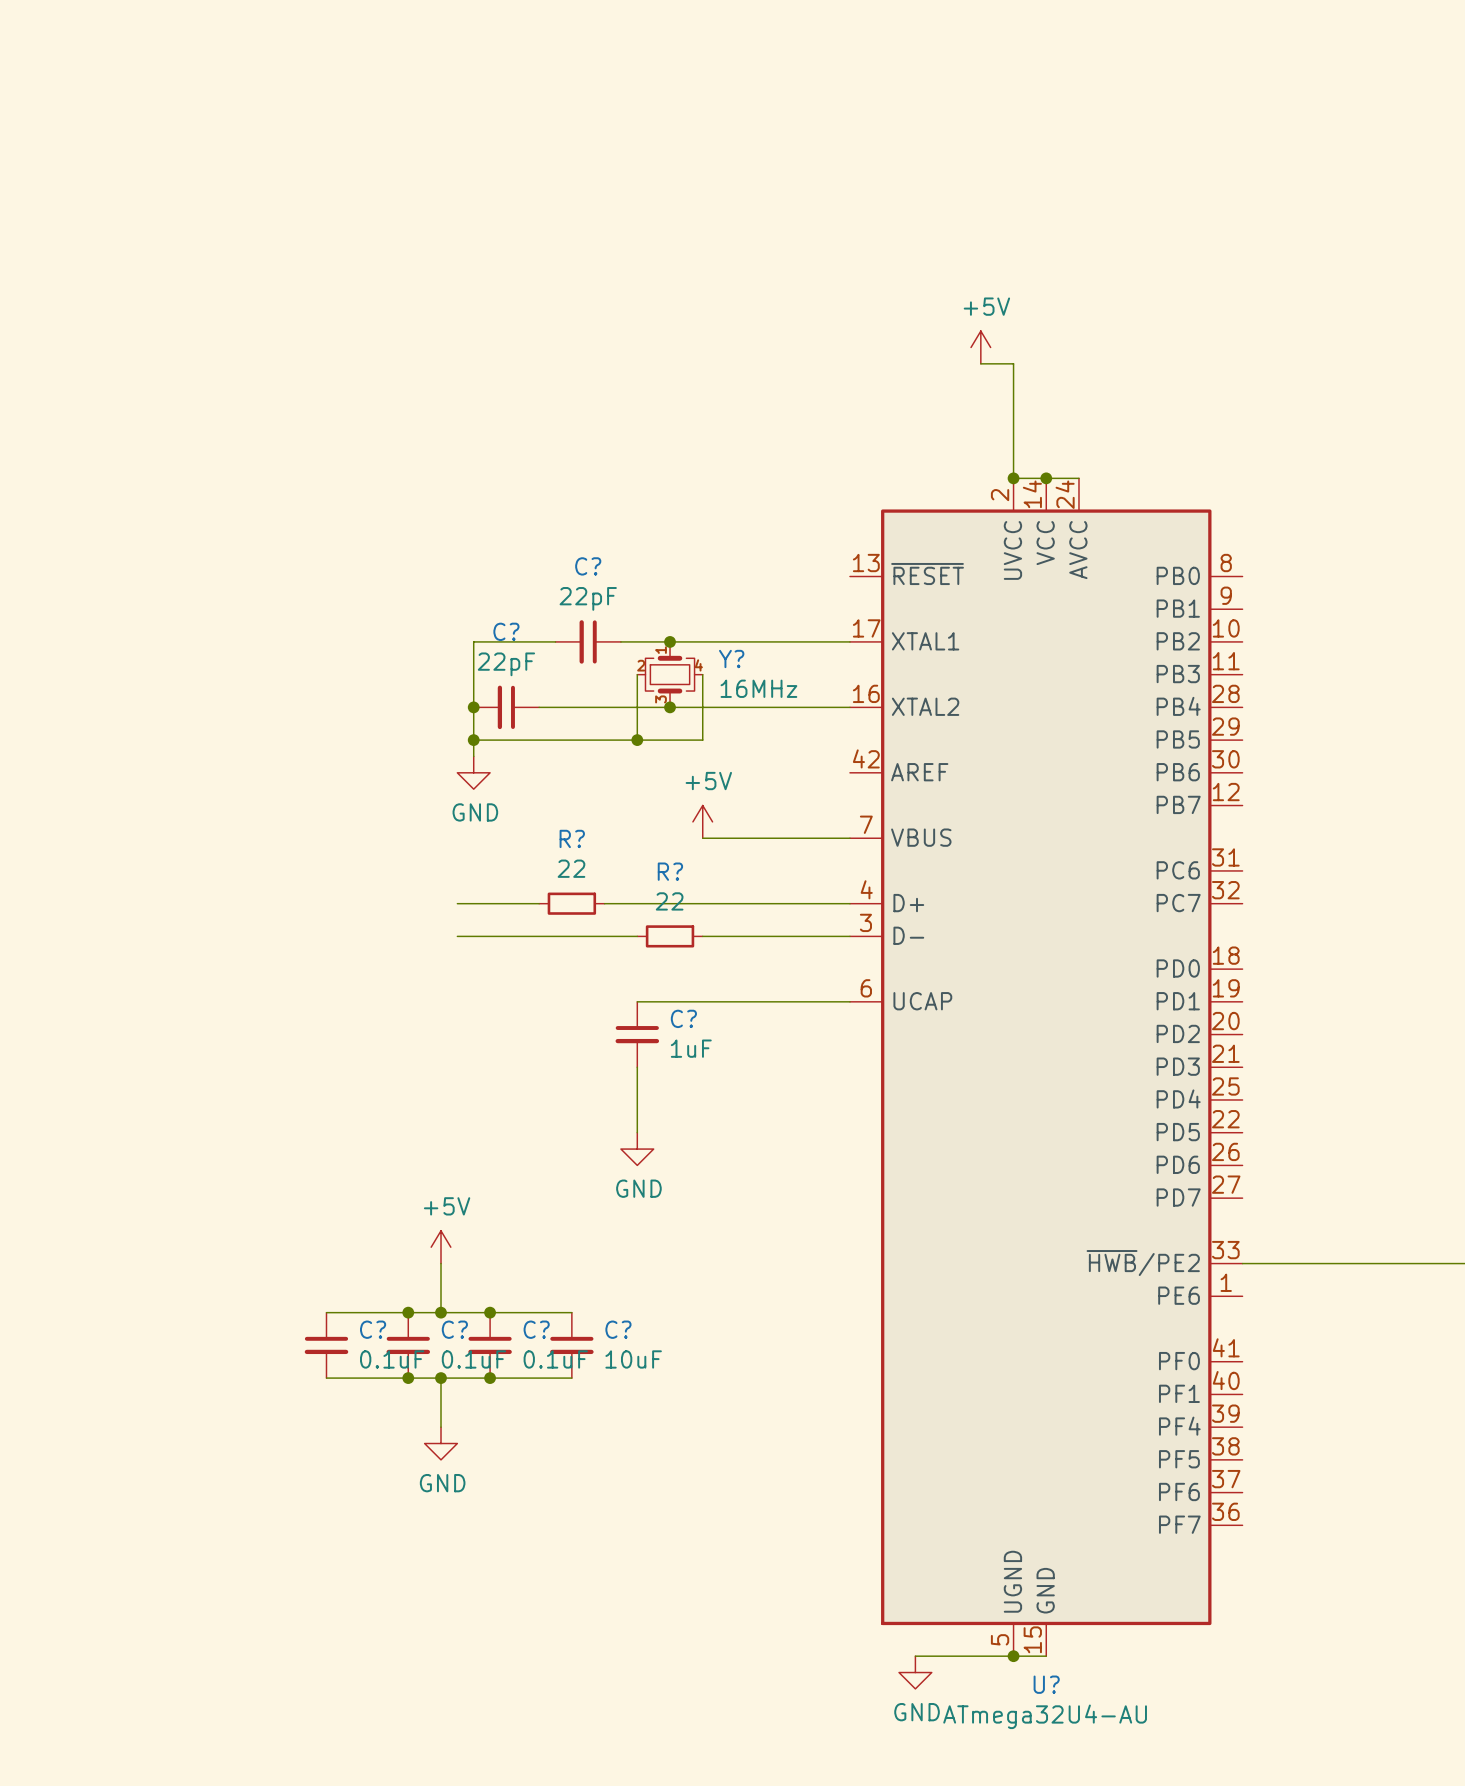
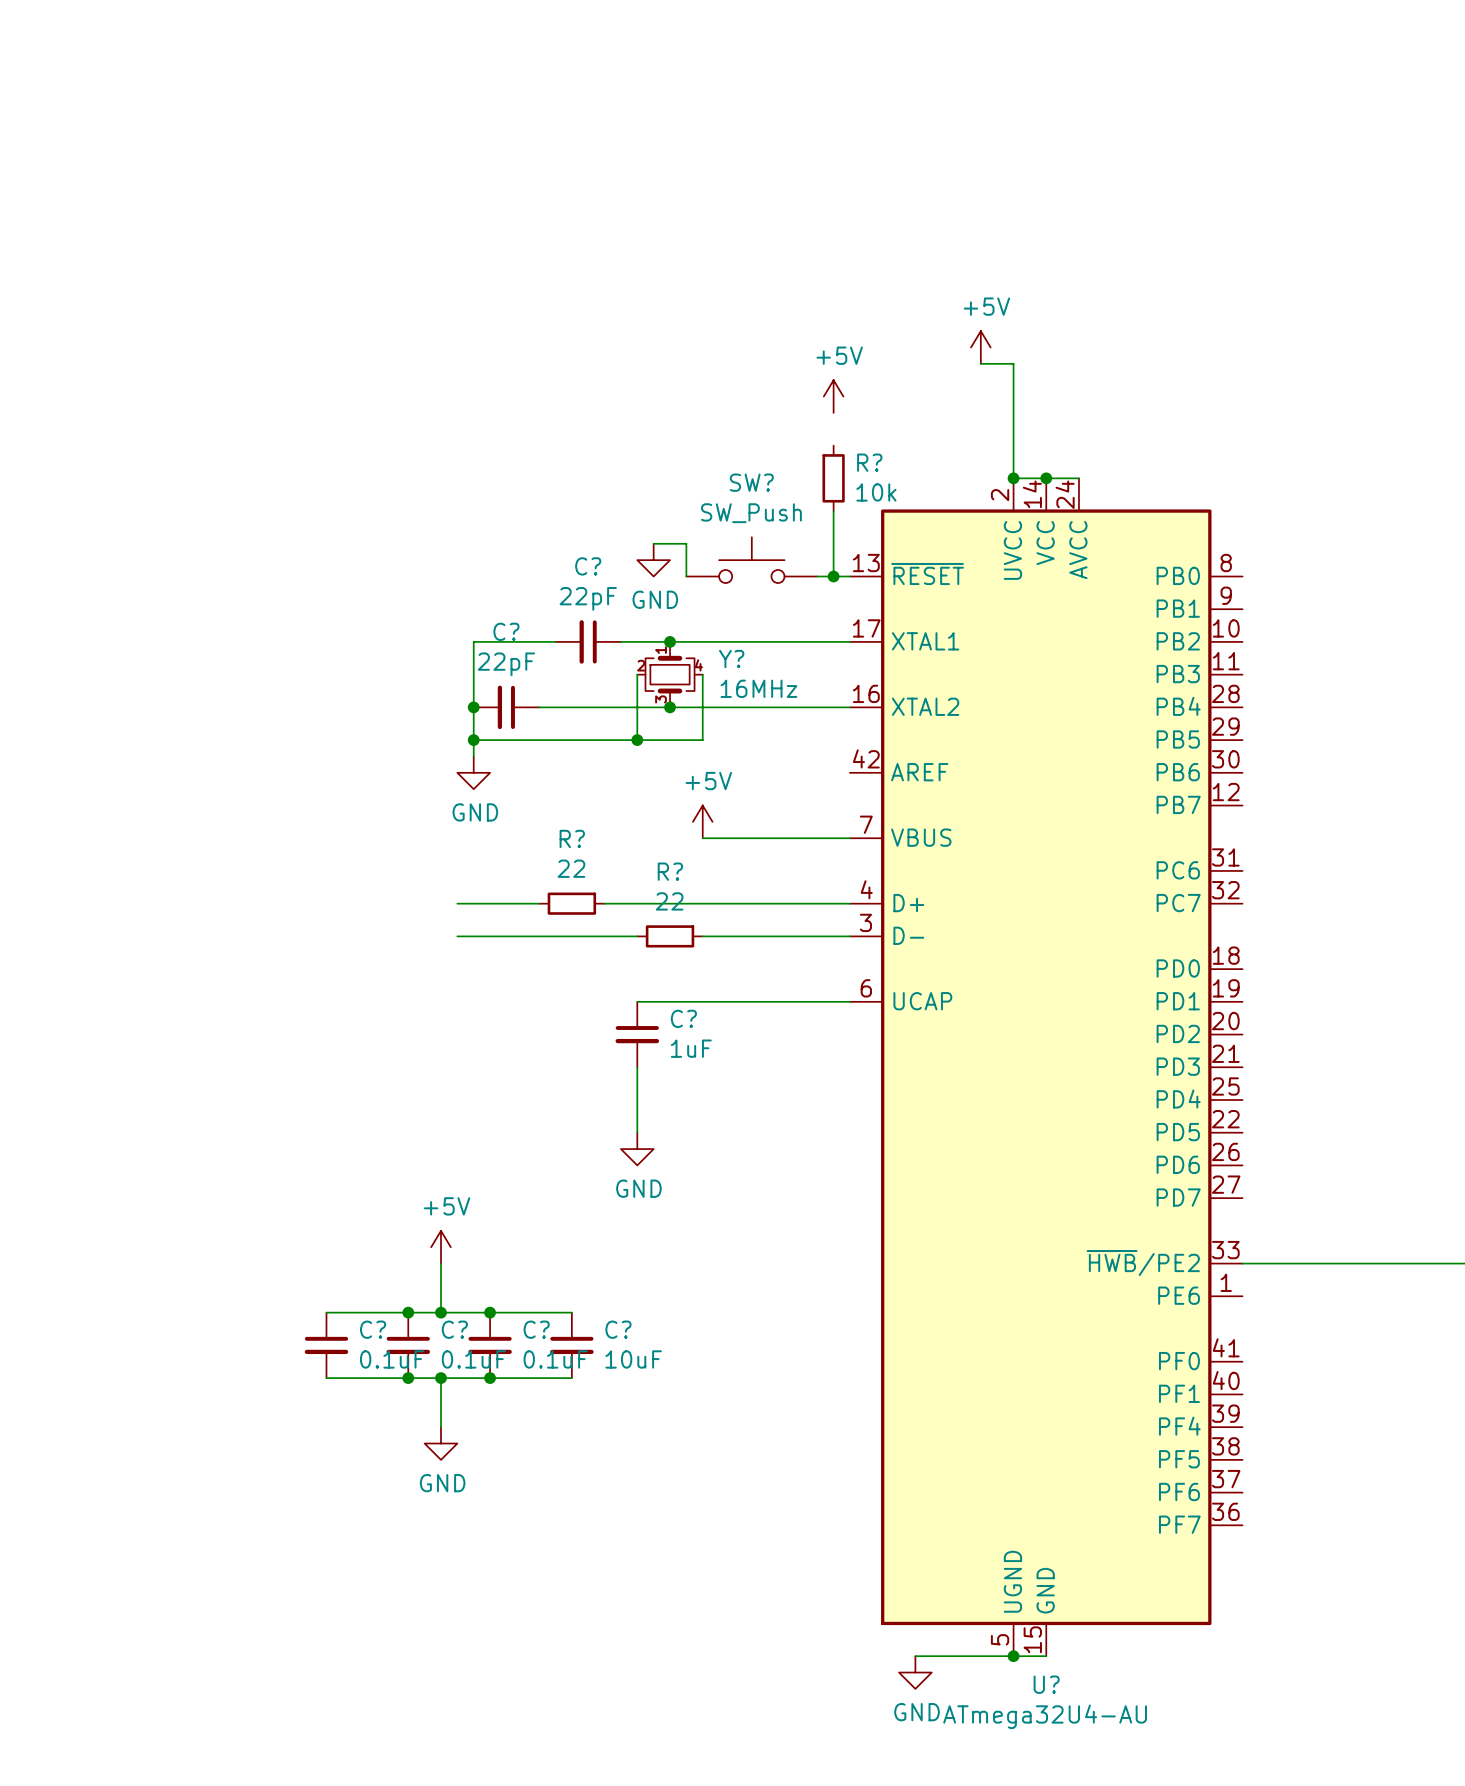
power symbol: none -> +5V (833, 396)
R?: none -> 10k (833, 478)
wire: none -> (833, 511) (833, 576)
wire: none -> (653, 543) (686, 543) (686, 576)
power symbol: none -> GND (653, 560)
SW?: none -> SW_Push (751, 560)
wire: none -> (817, 576) (849, 576)
junction: none -> (833, 576)

